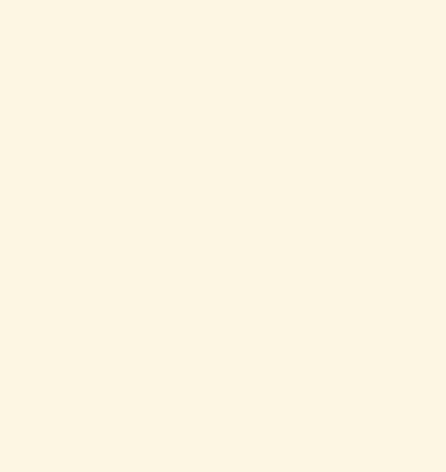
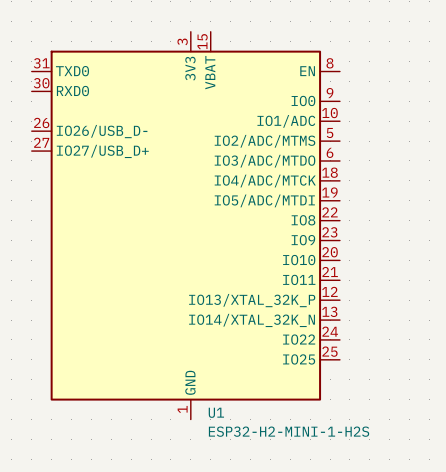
U1: none -> ESP32-H2-MINI-1-H2S (185, 225)

